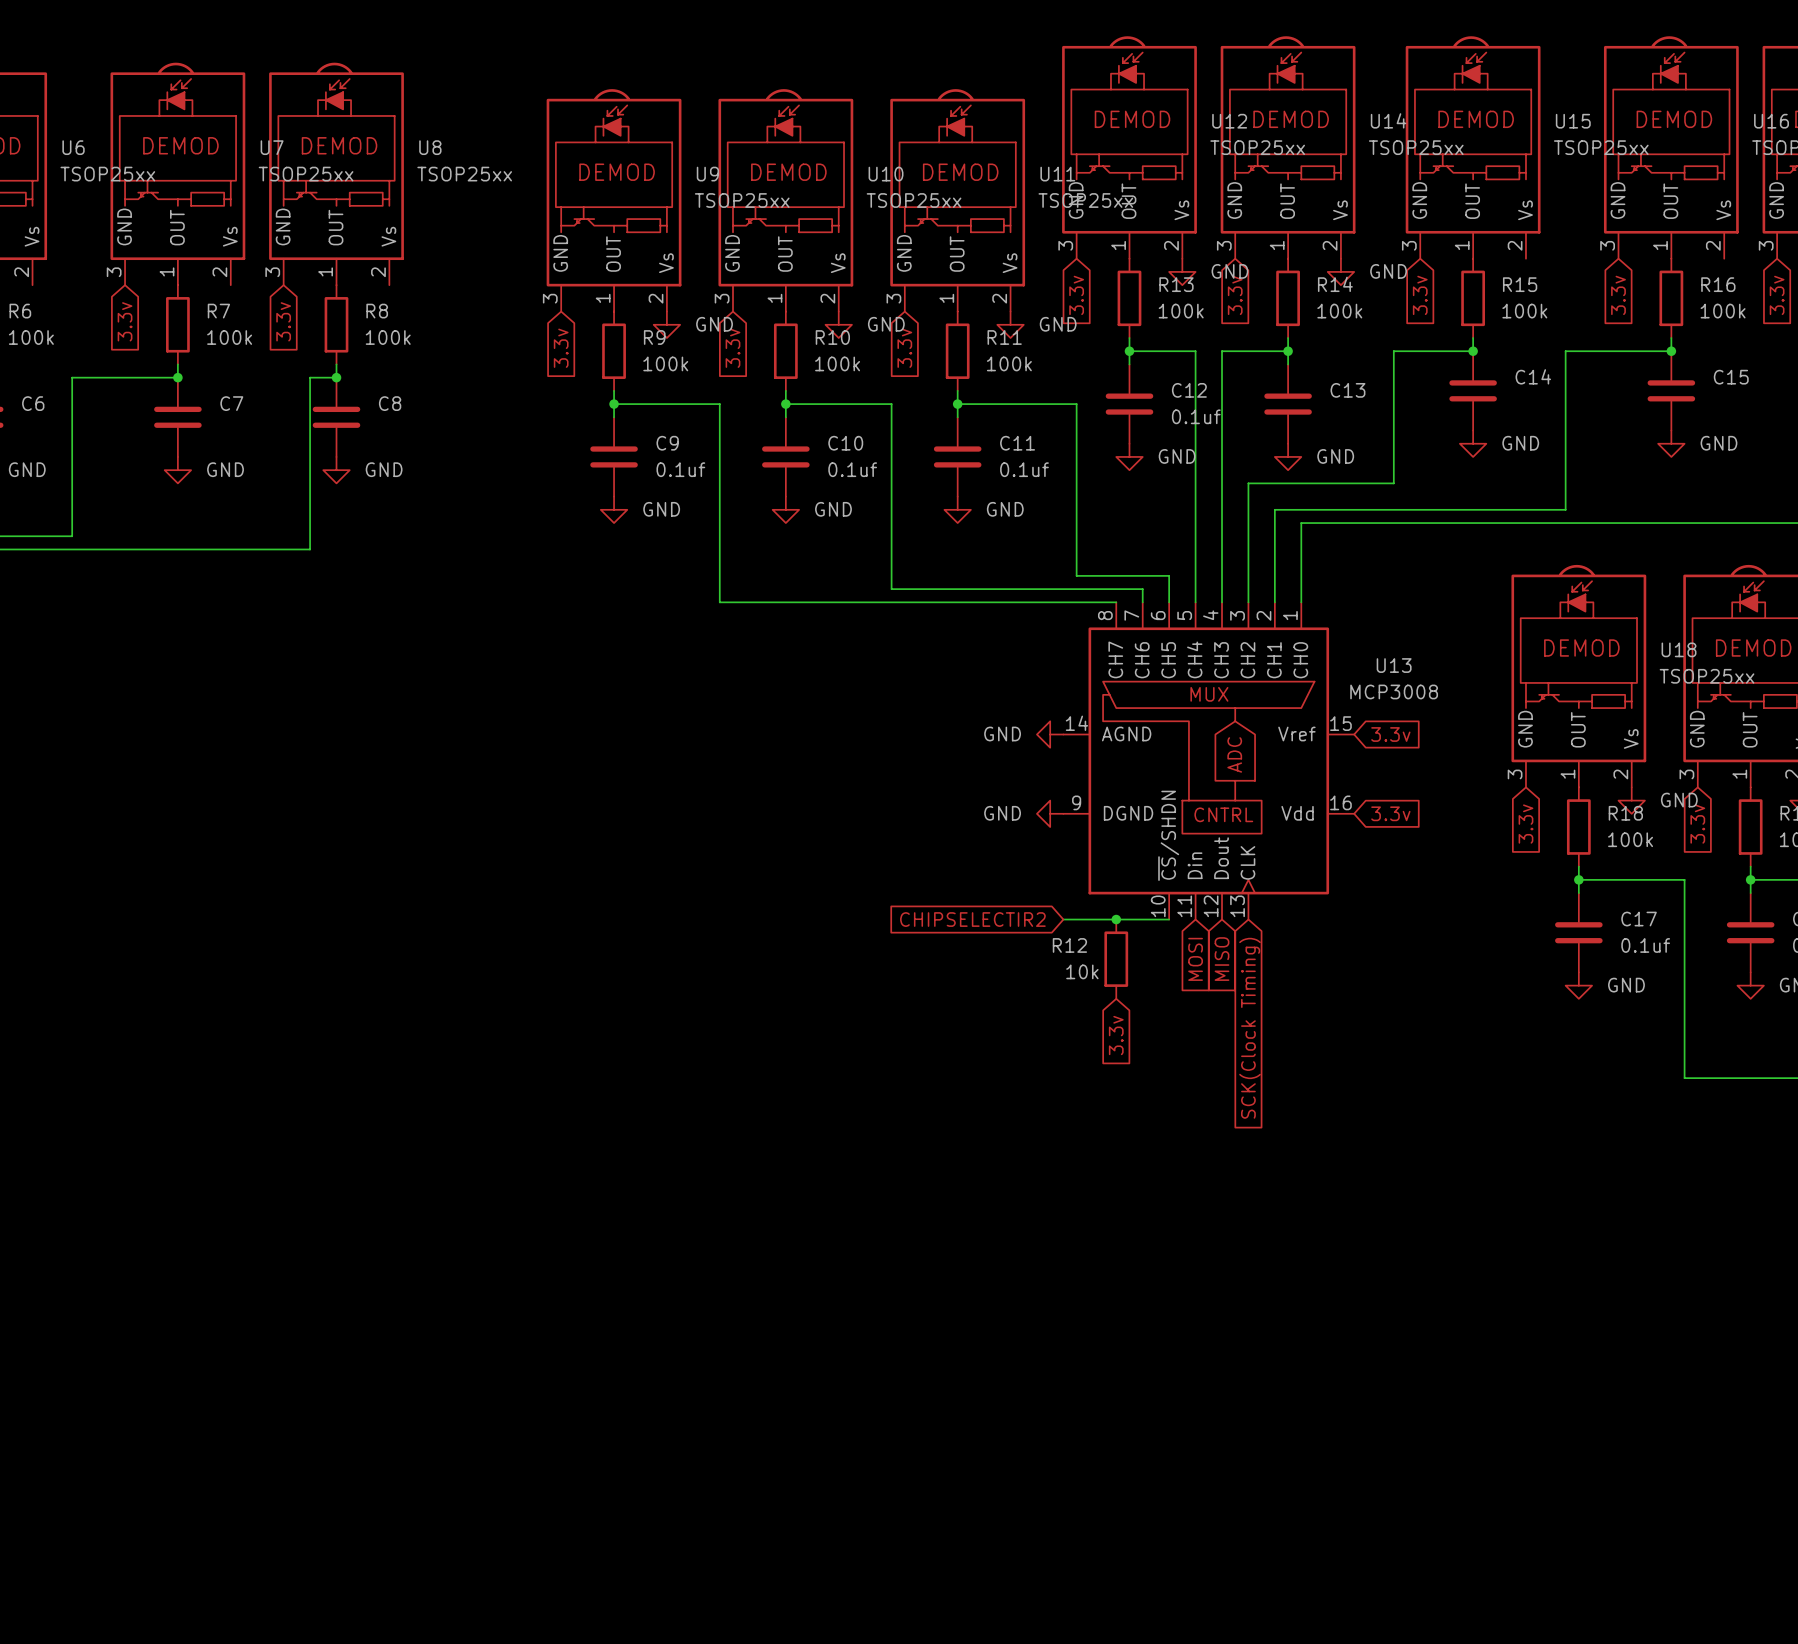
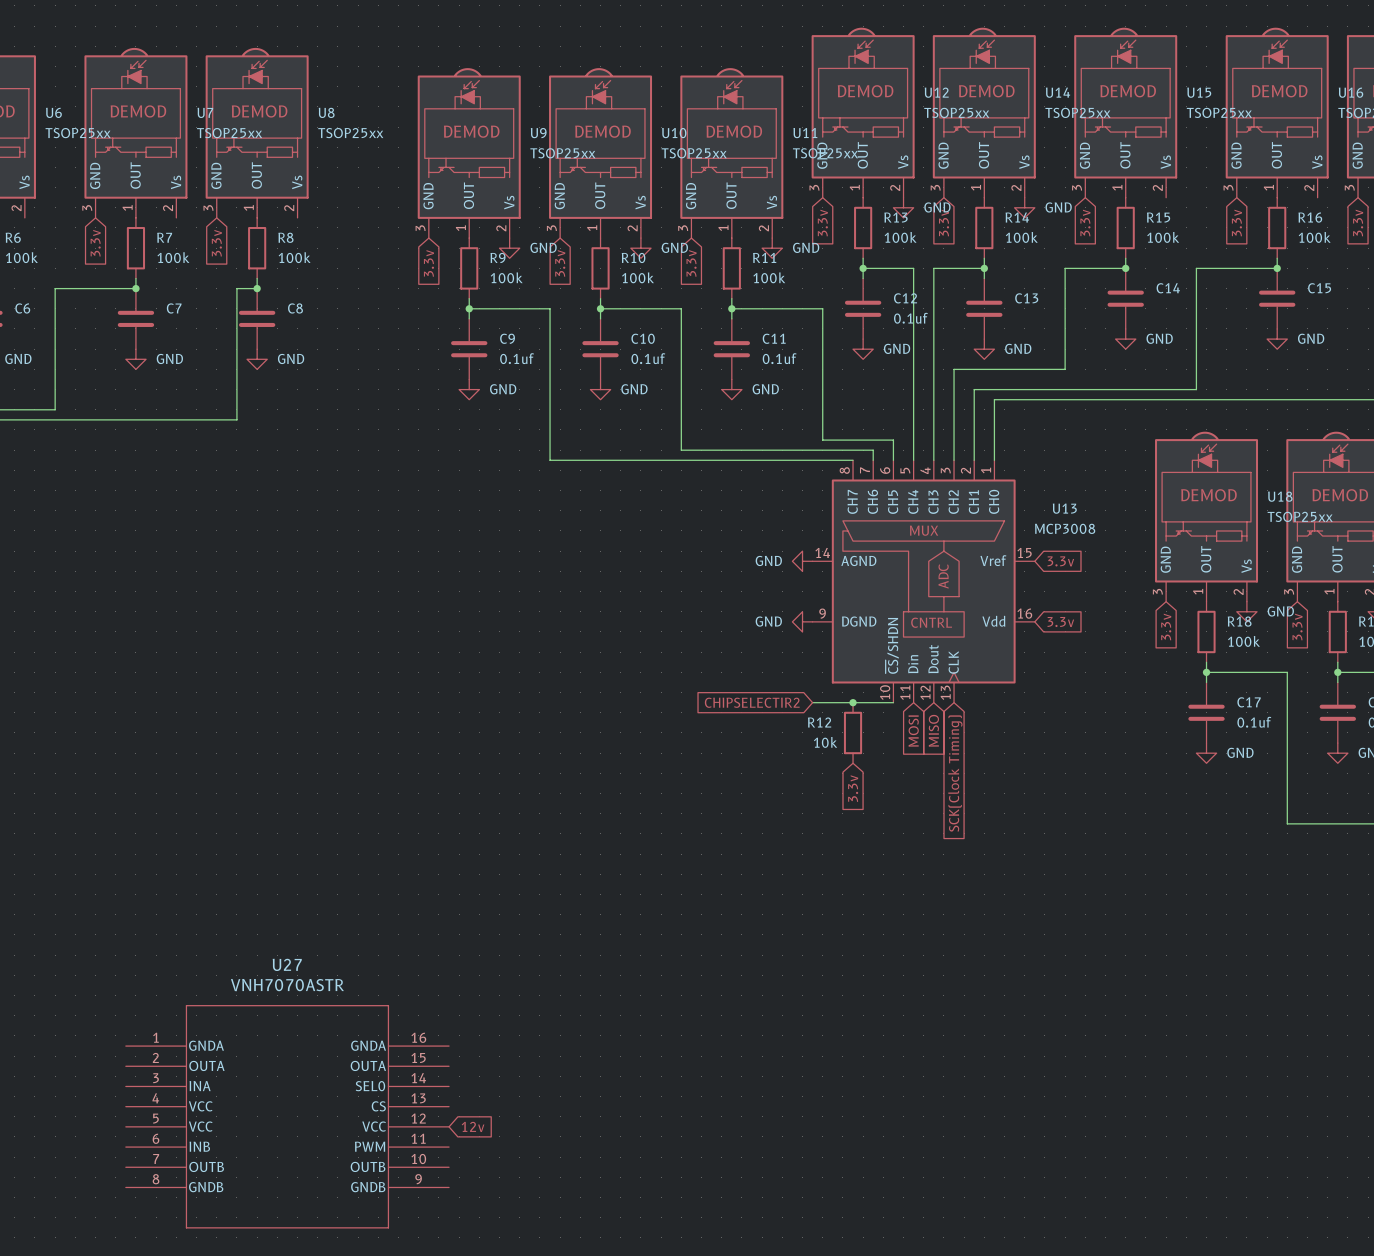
U27: none -> VNH7070ASTR (287, 1116)
global label: none -> 12v (473, 1126)

